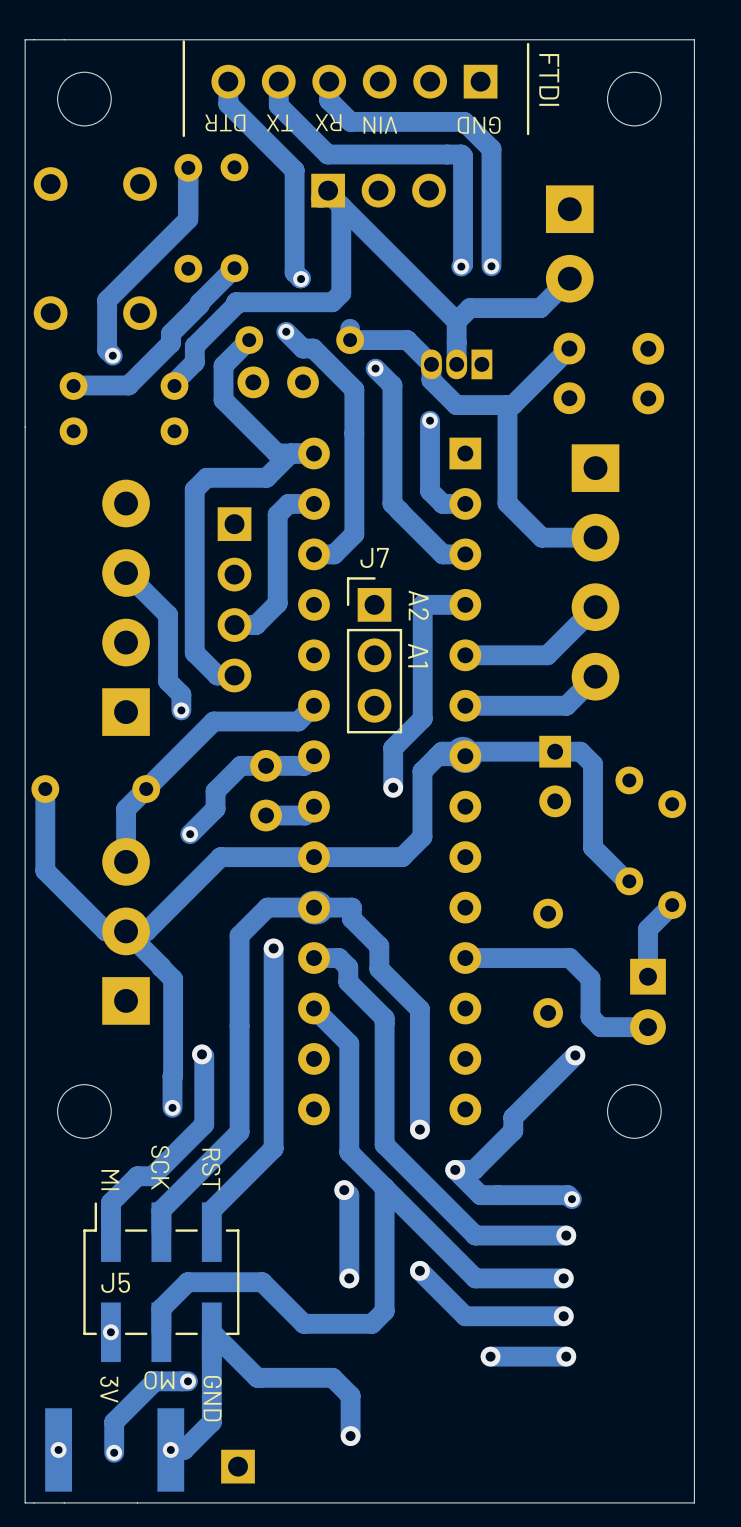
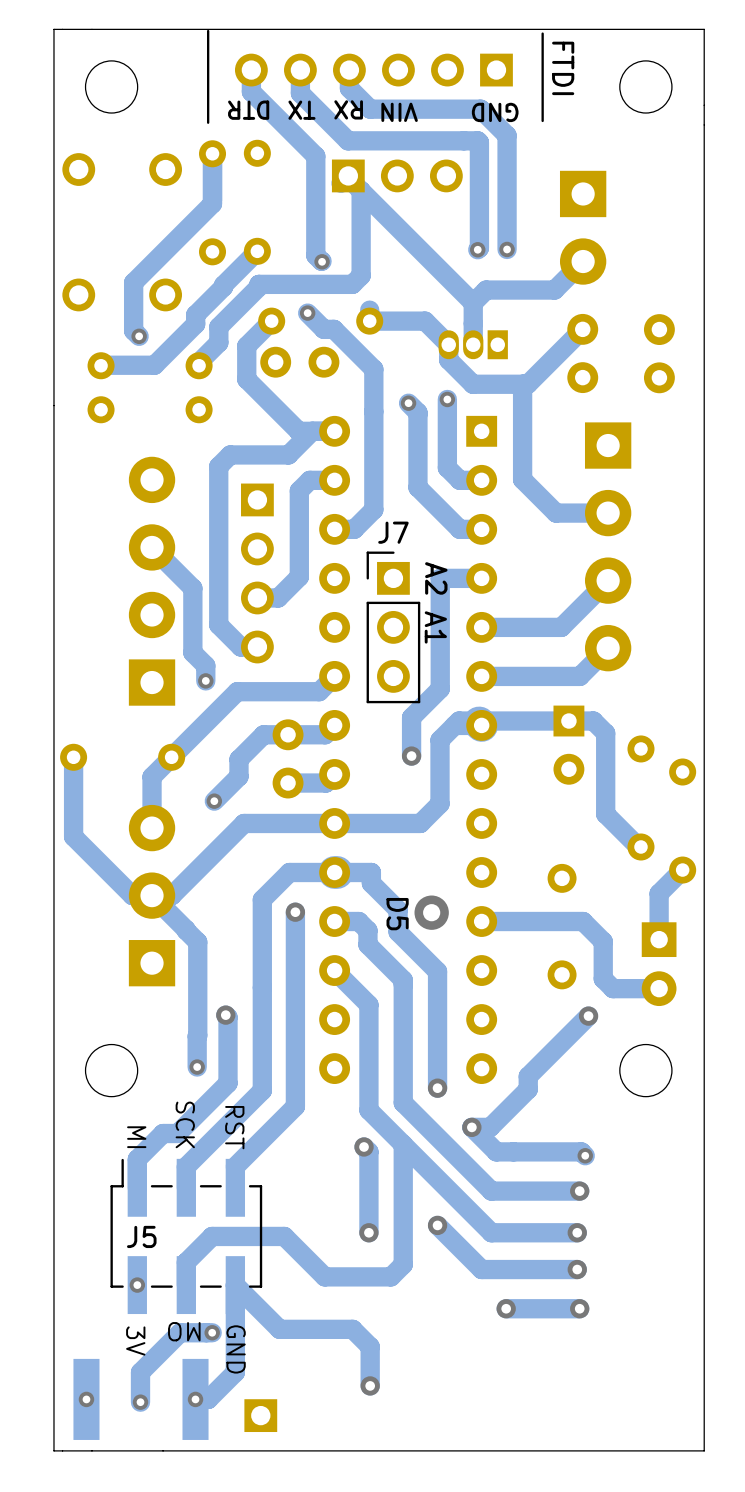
track: (375, 368) (392, 385) (392, 503) (399, 510) -> (408, 403) (417, 412) (417, 487)
via position: (375, 368) -> (408, 403)
via: none -> (431, 912)
text: none -> D5 (397, 914)

